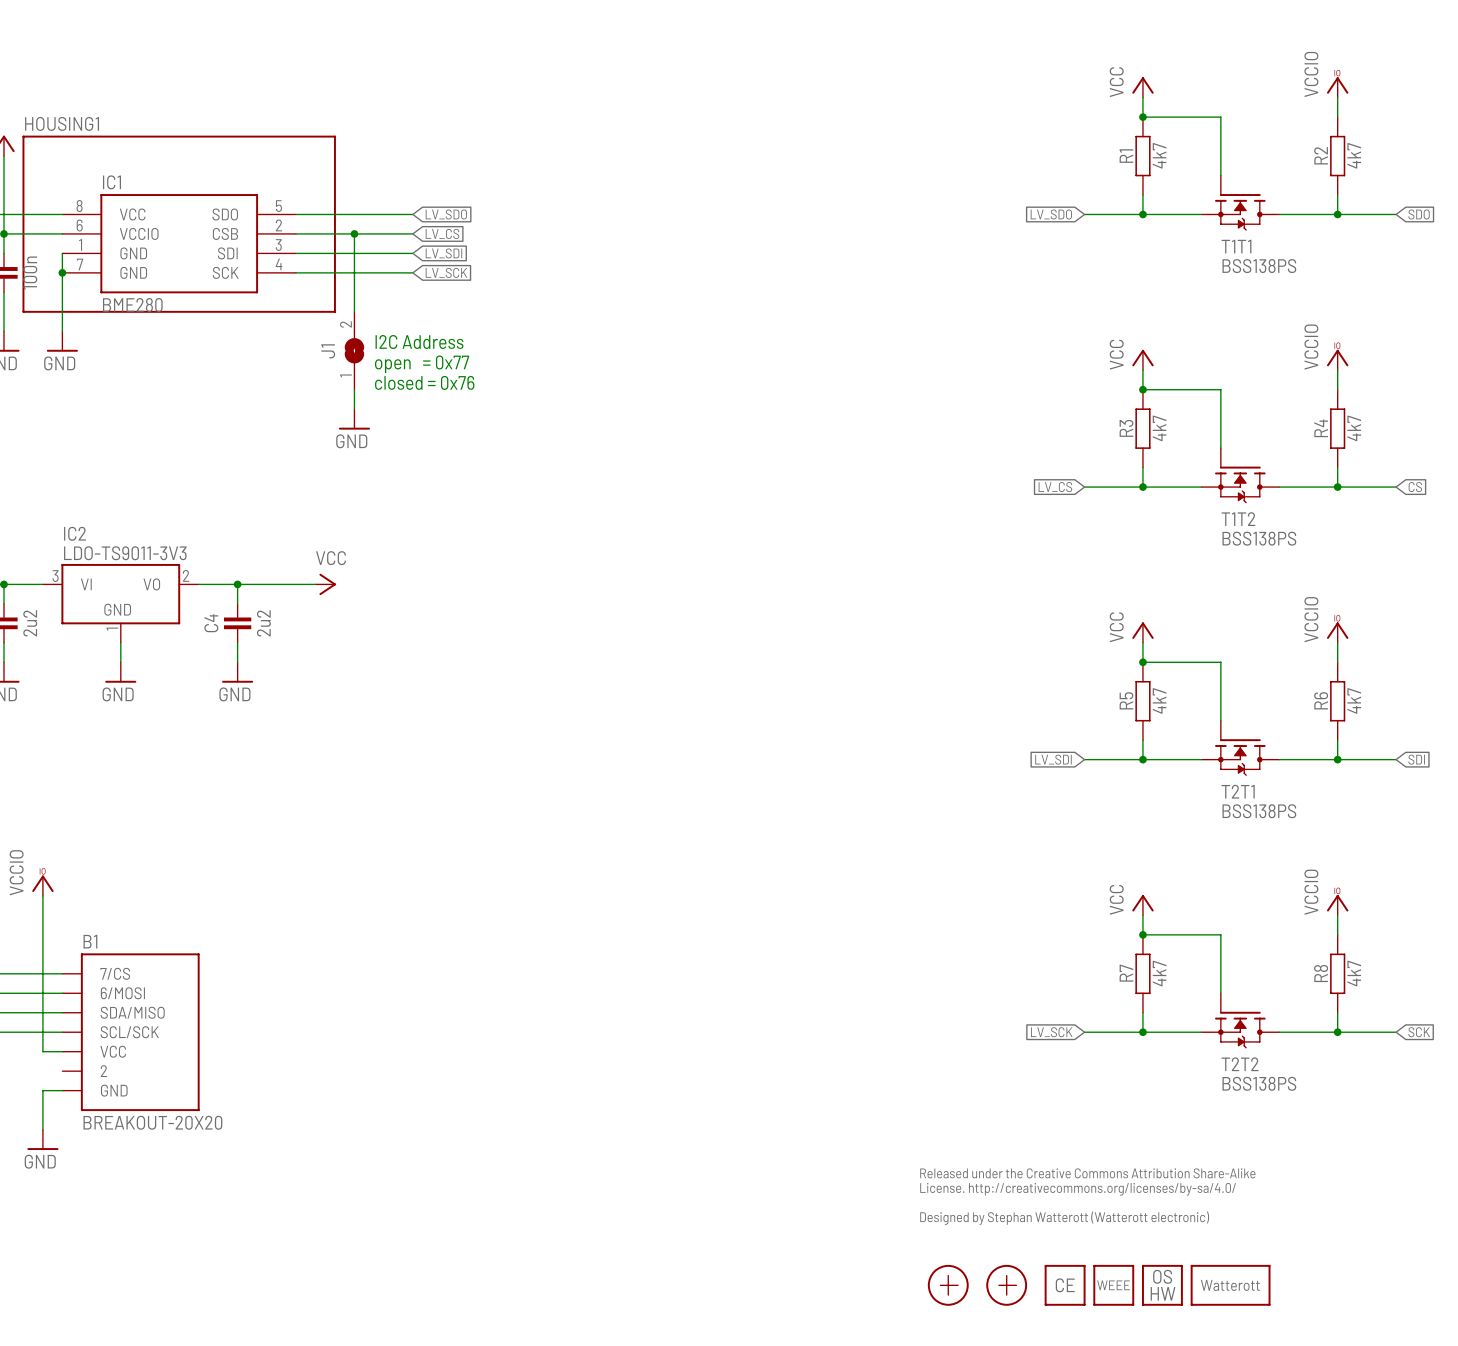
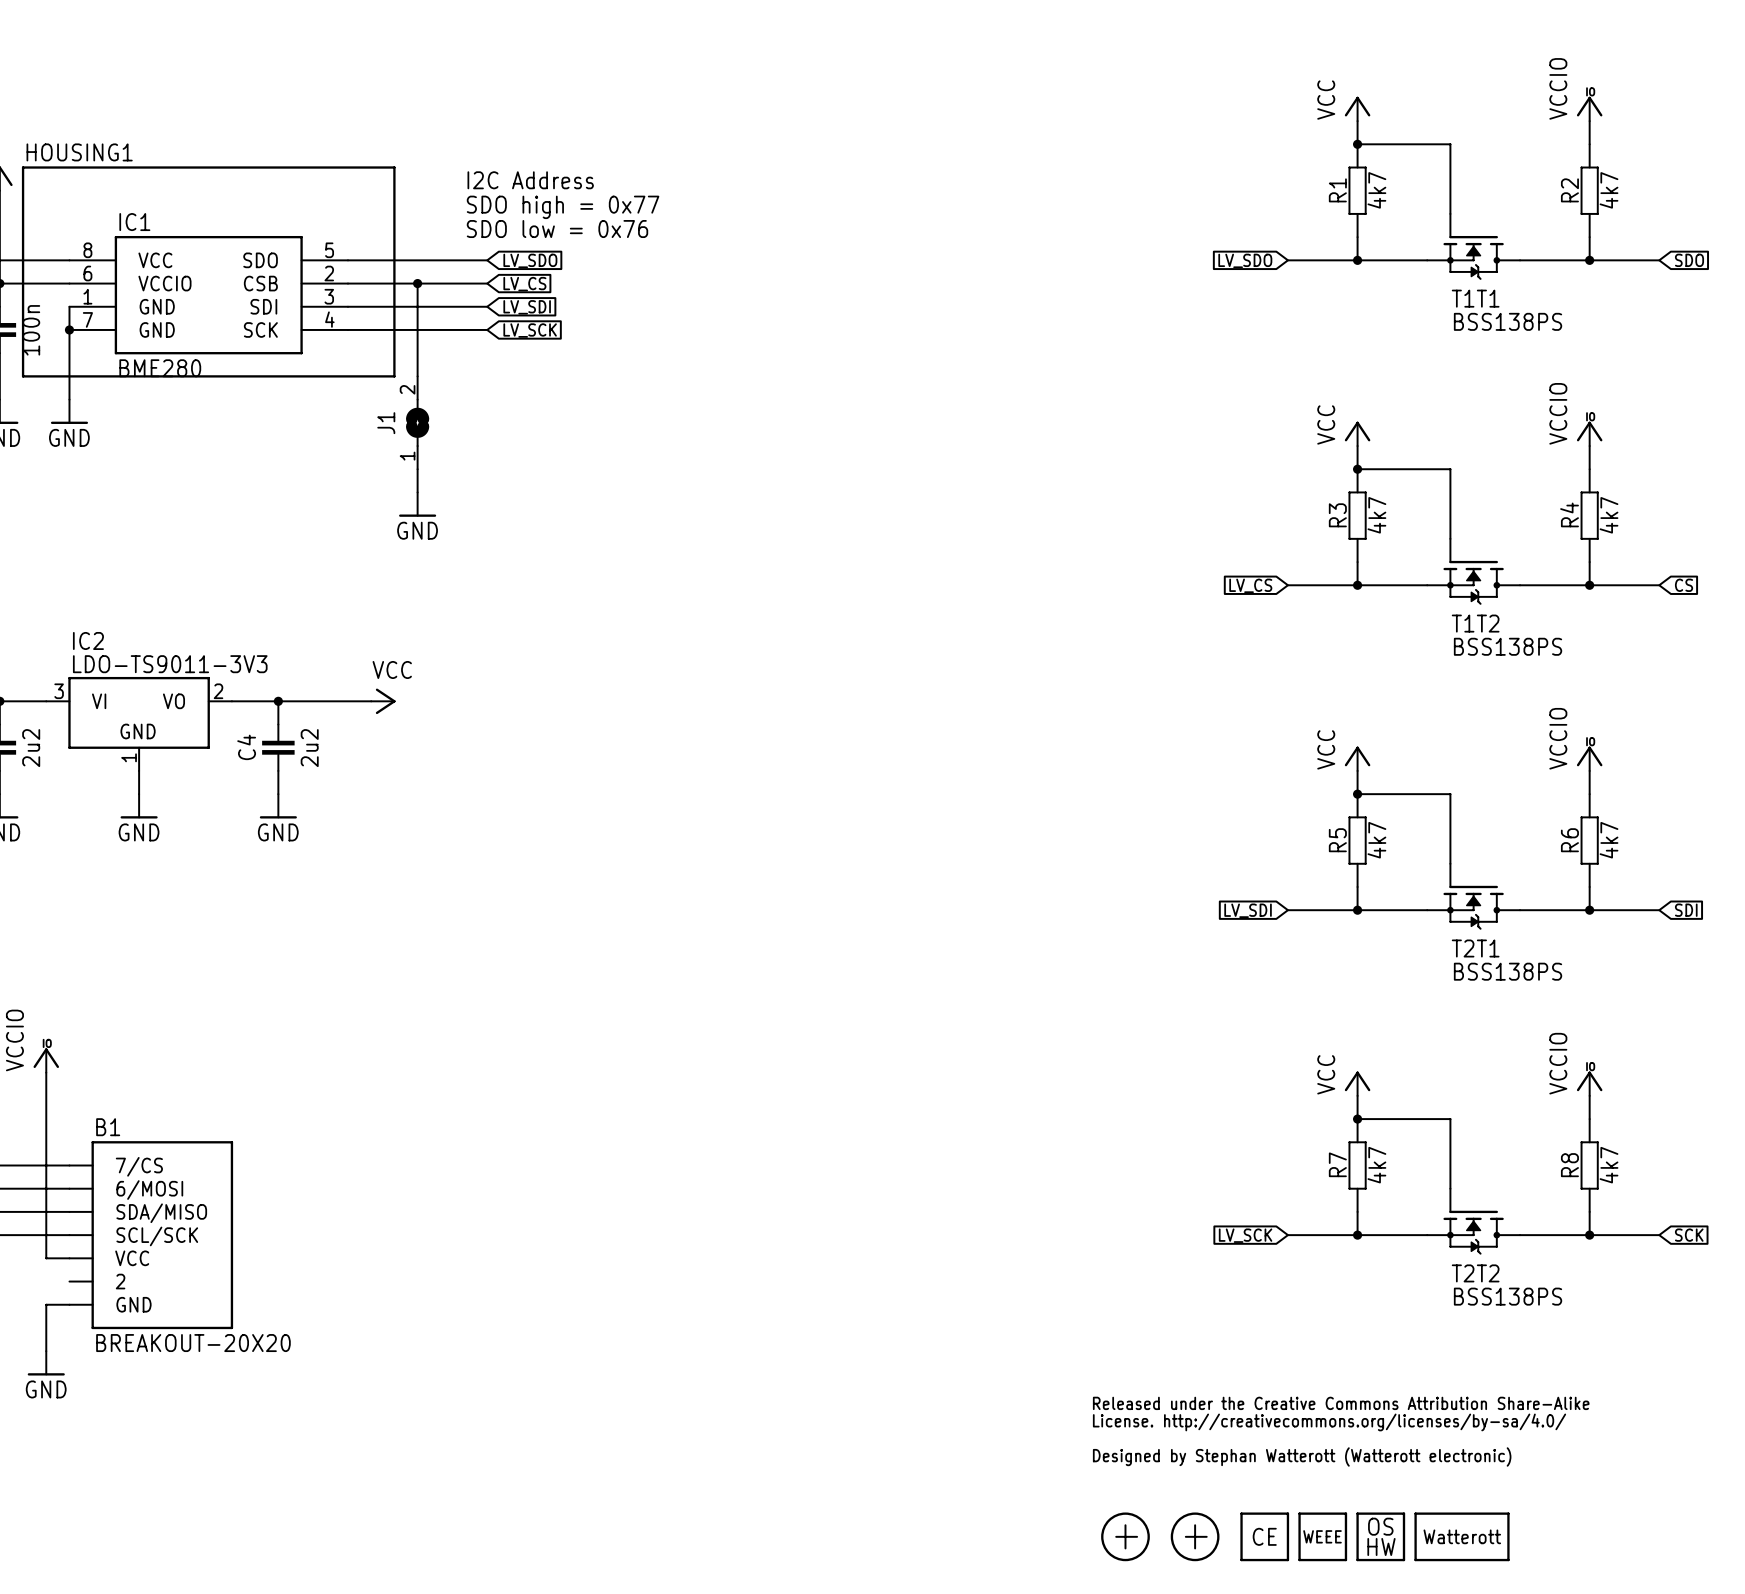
text: none -> I2C Address (530, 180)
text: none -> SDO high = 0x77 (563, 207)
text: none -> SDO low = 0x76 (557, 229)
text: I2C Address (419, 342) -> none
text: open = 0x77 (422, 364) -> none
text: closed = 0x76 (424, 382) -> none

